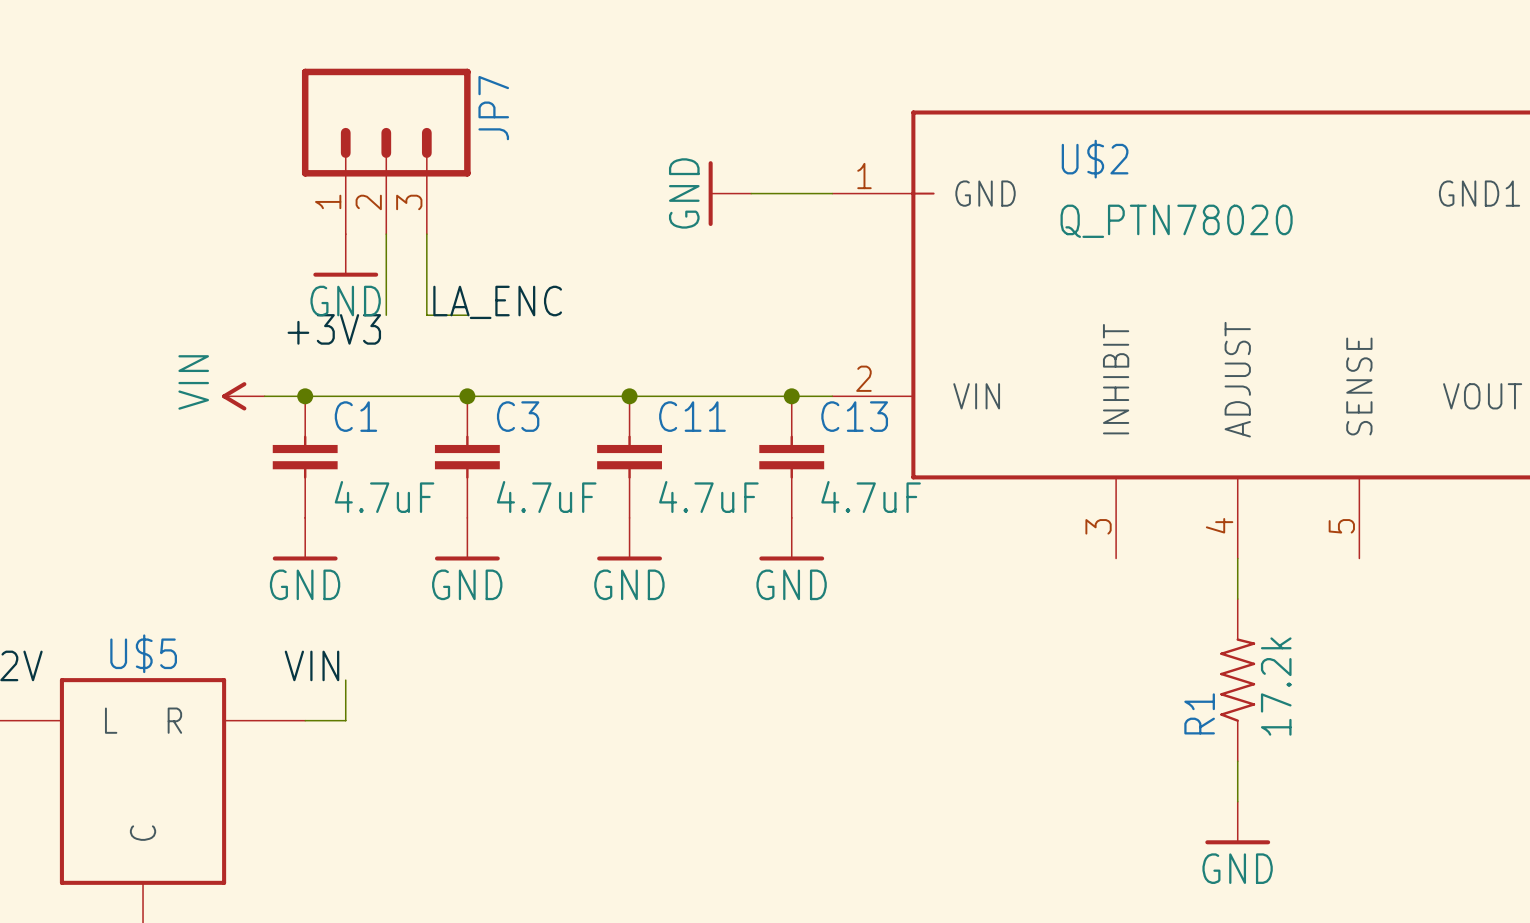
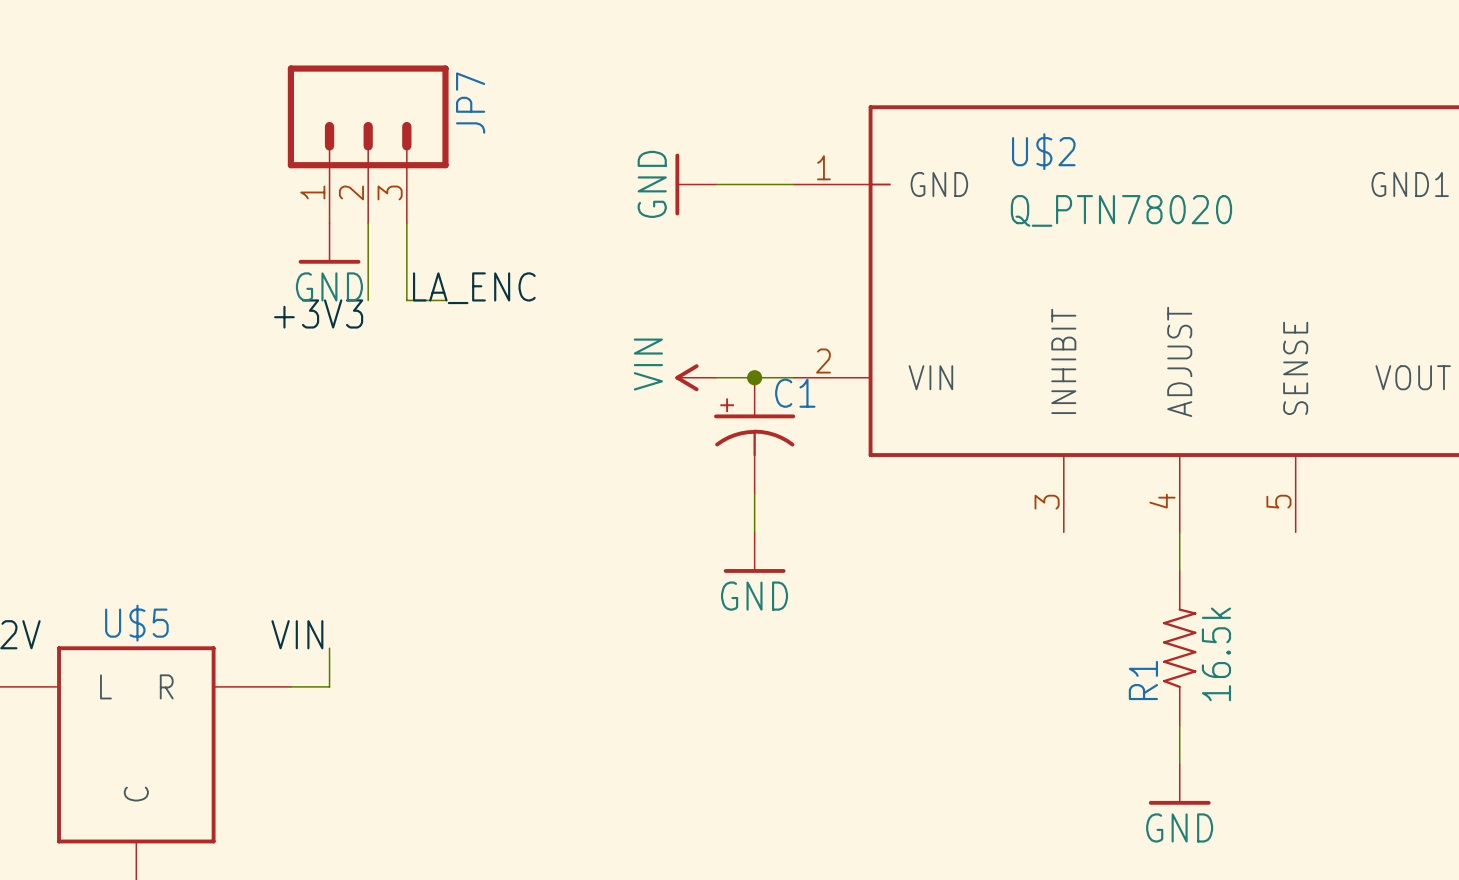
power symbol: VIN (243, 396) -> none
wire: (264, 396) (751, 396) -> none
C1 symbol: [272, 396, 338, 518] -> [714, 377, 796, 494]
junction: (305, 396) -> none
junction: (467, 396) -> none
junction: (629, 396) -> none
power symbol: none -> VIN (695, 377)
C3: 4.7uF (467, 457) -> none
C11: 4.7uF (629, 457) -> none
C13: 4.7uF (791, 457) -> none
C1 value: 4.7uF (384, 496) -> none
power symbol: GND (305, 539) -> none
power symbol: GND (467, 539) -> none
power symbol: GND (629, 539) -> none
power symbol position: GND (791, 539) -> GND (754, 552)
R1 value: 17.2k (1276, 686) -> 16.5k (1216, 654)

